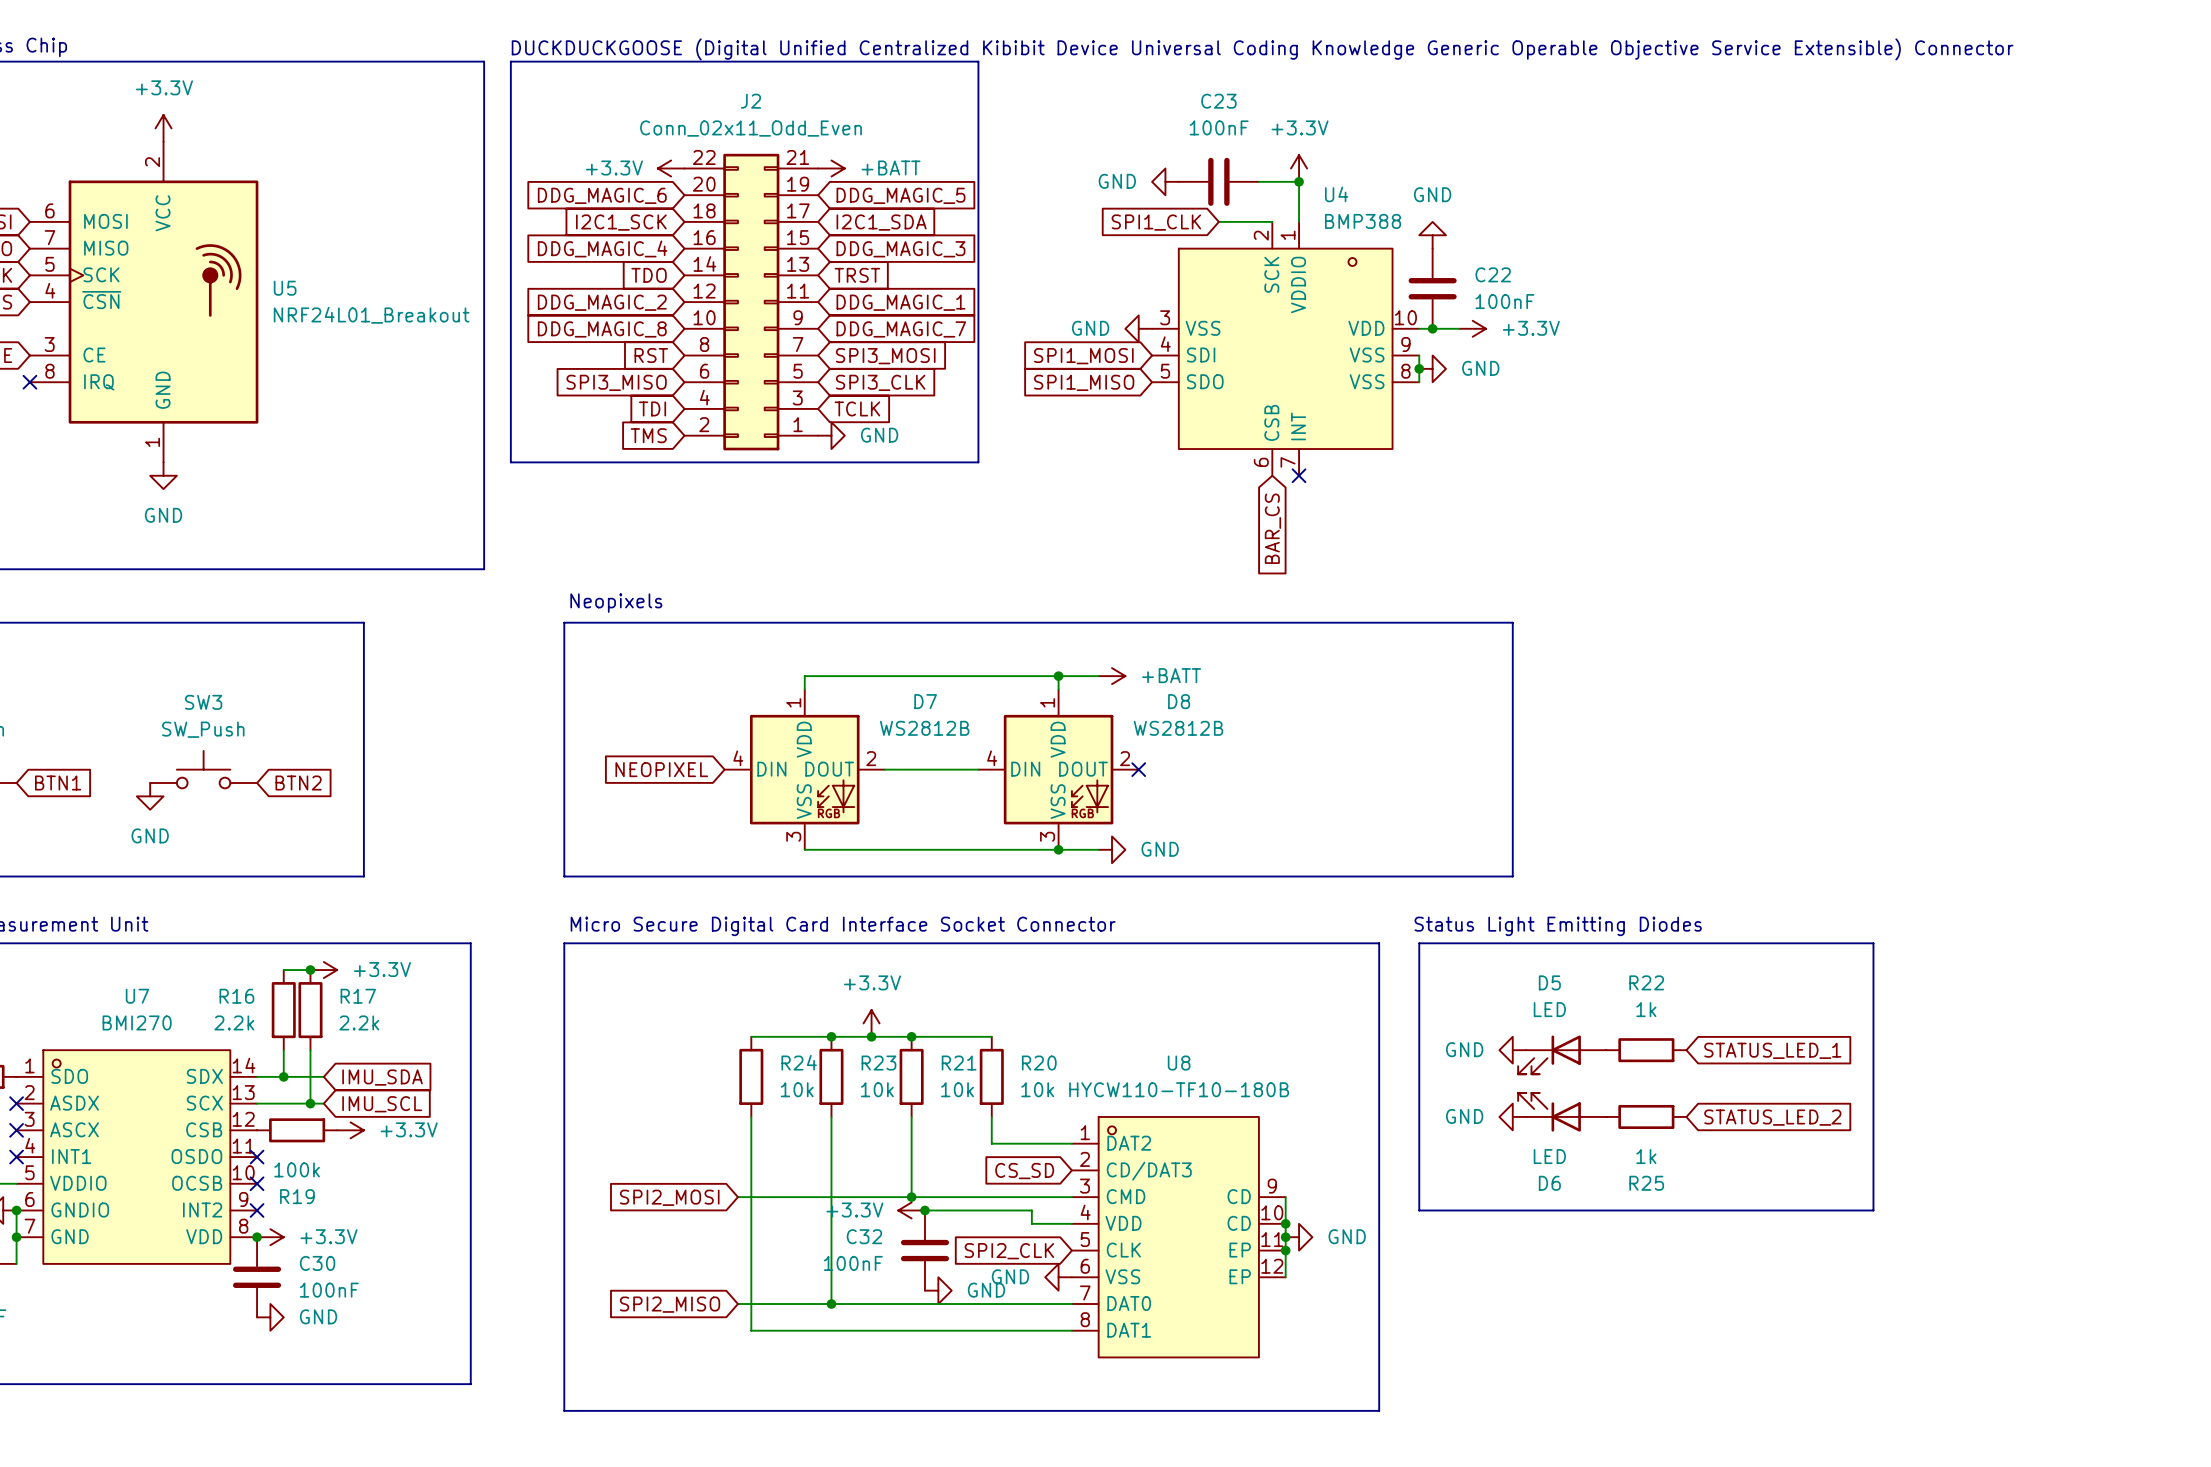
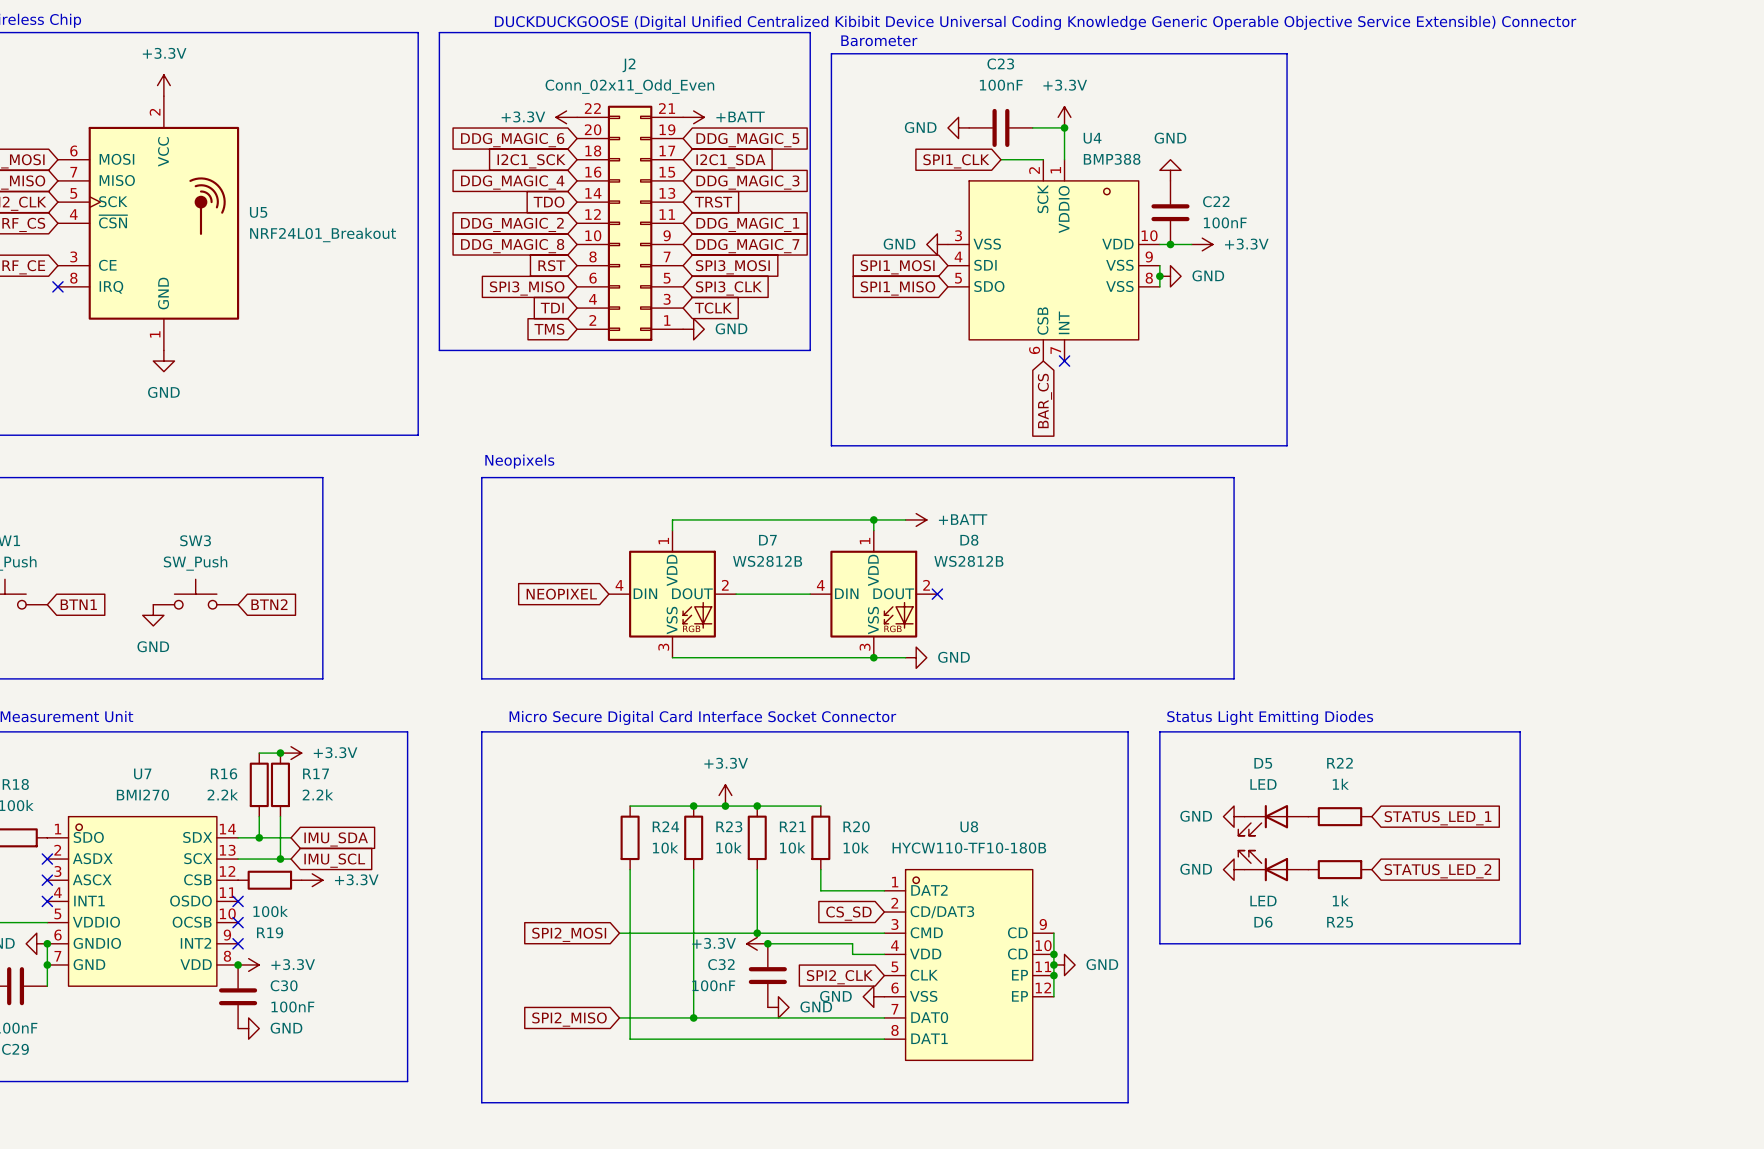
text: none -> Barometer (879, 40)
line: none -> (831, 53) (1287, 53) (1287, 445) (831, 445) (831, 53)

